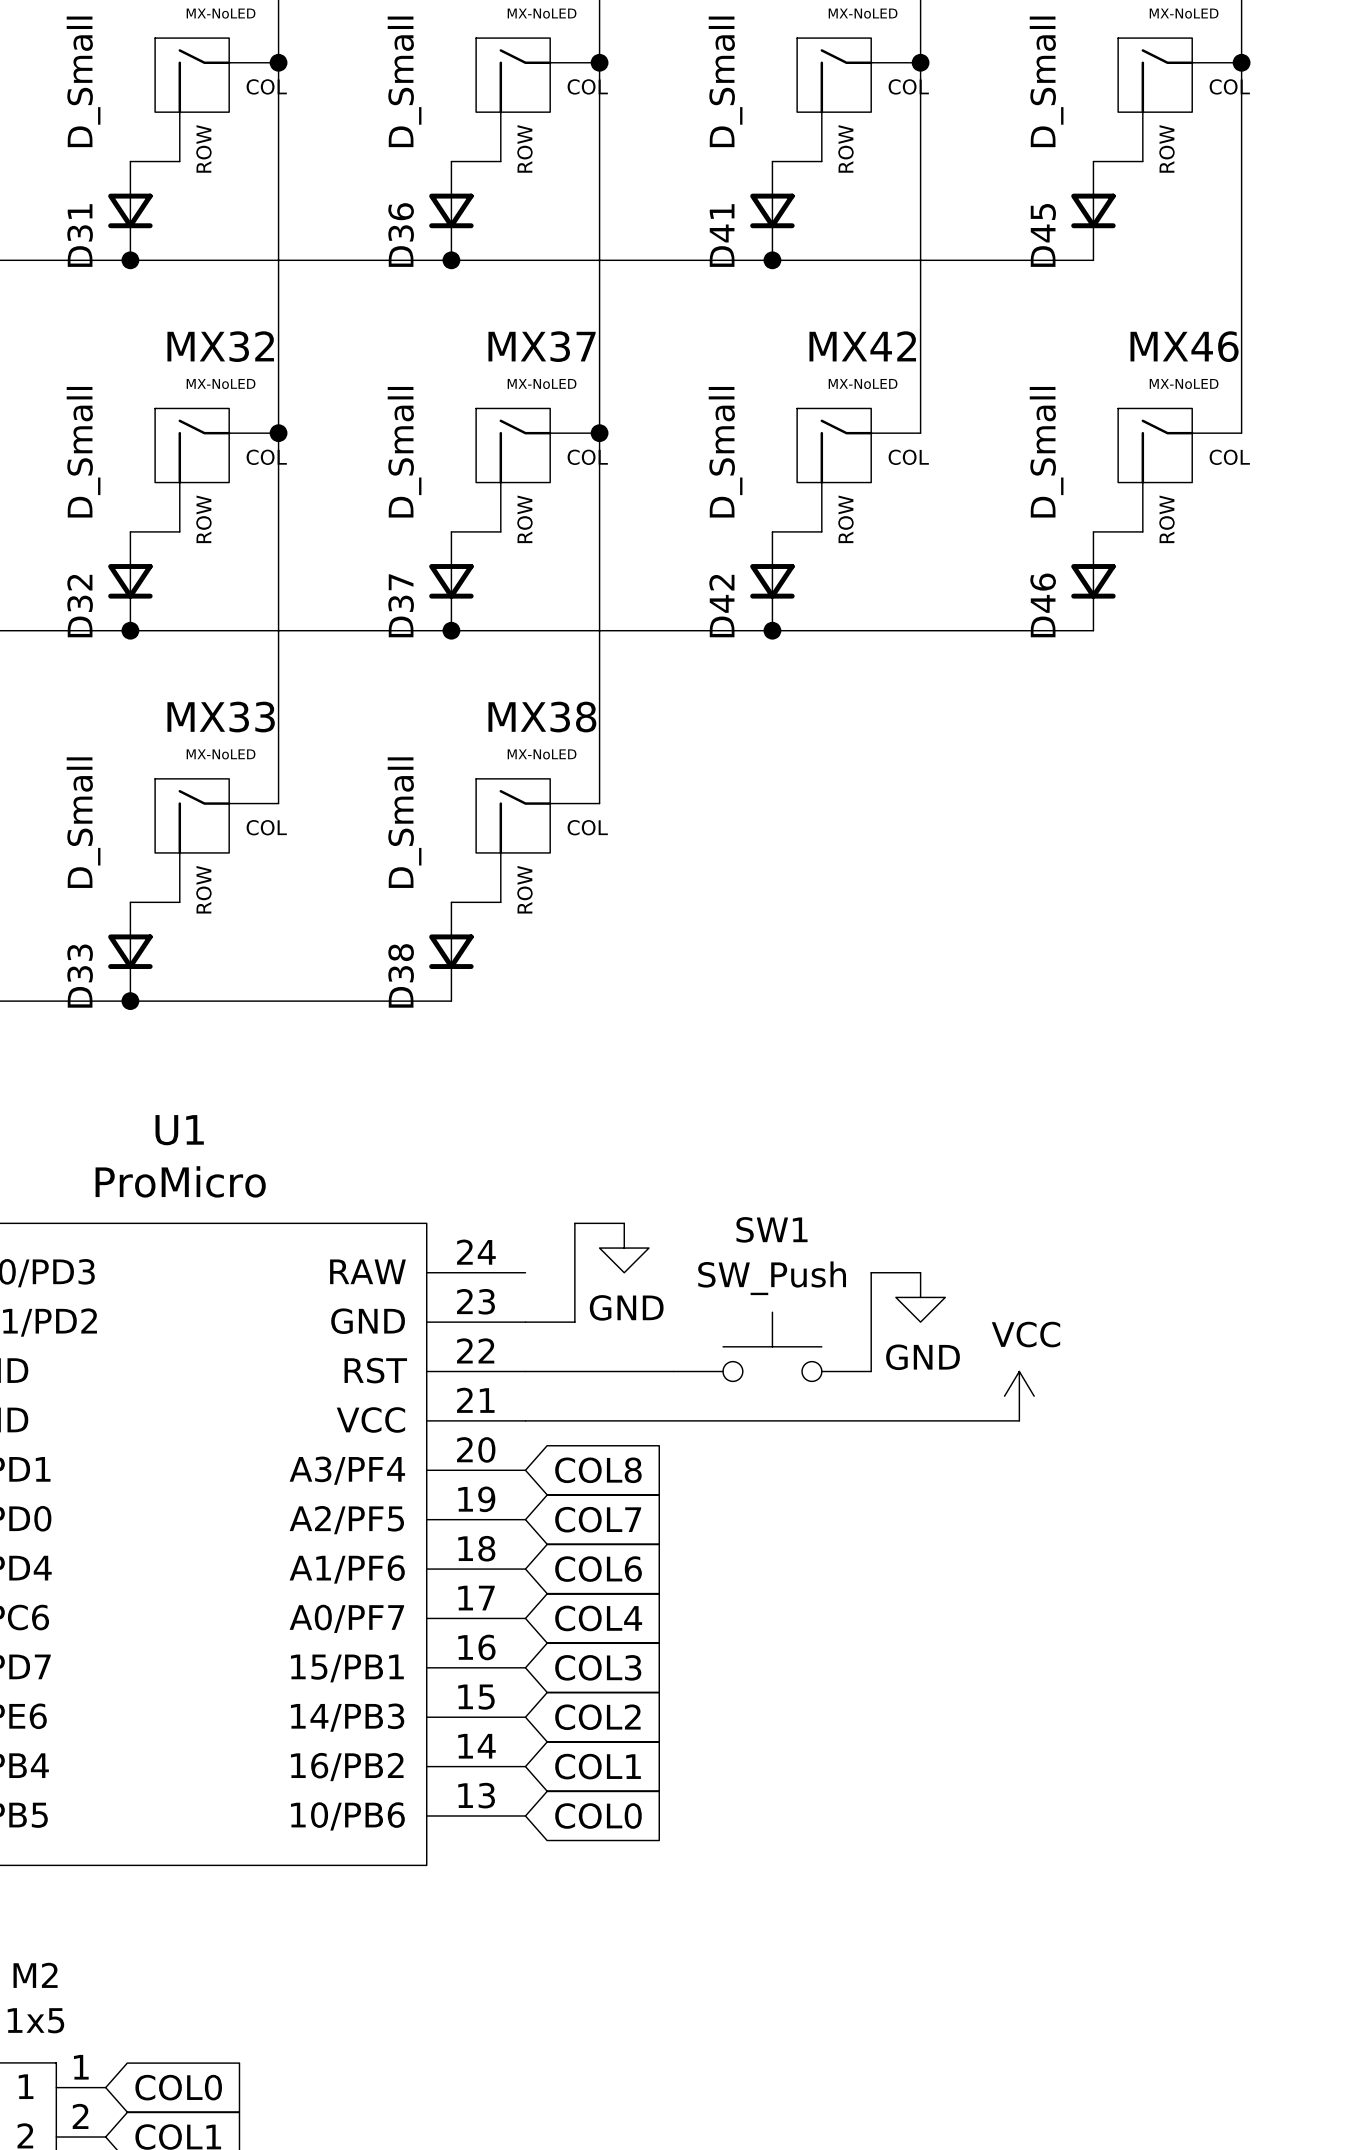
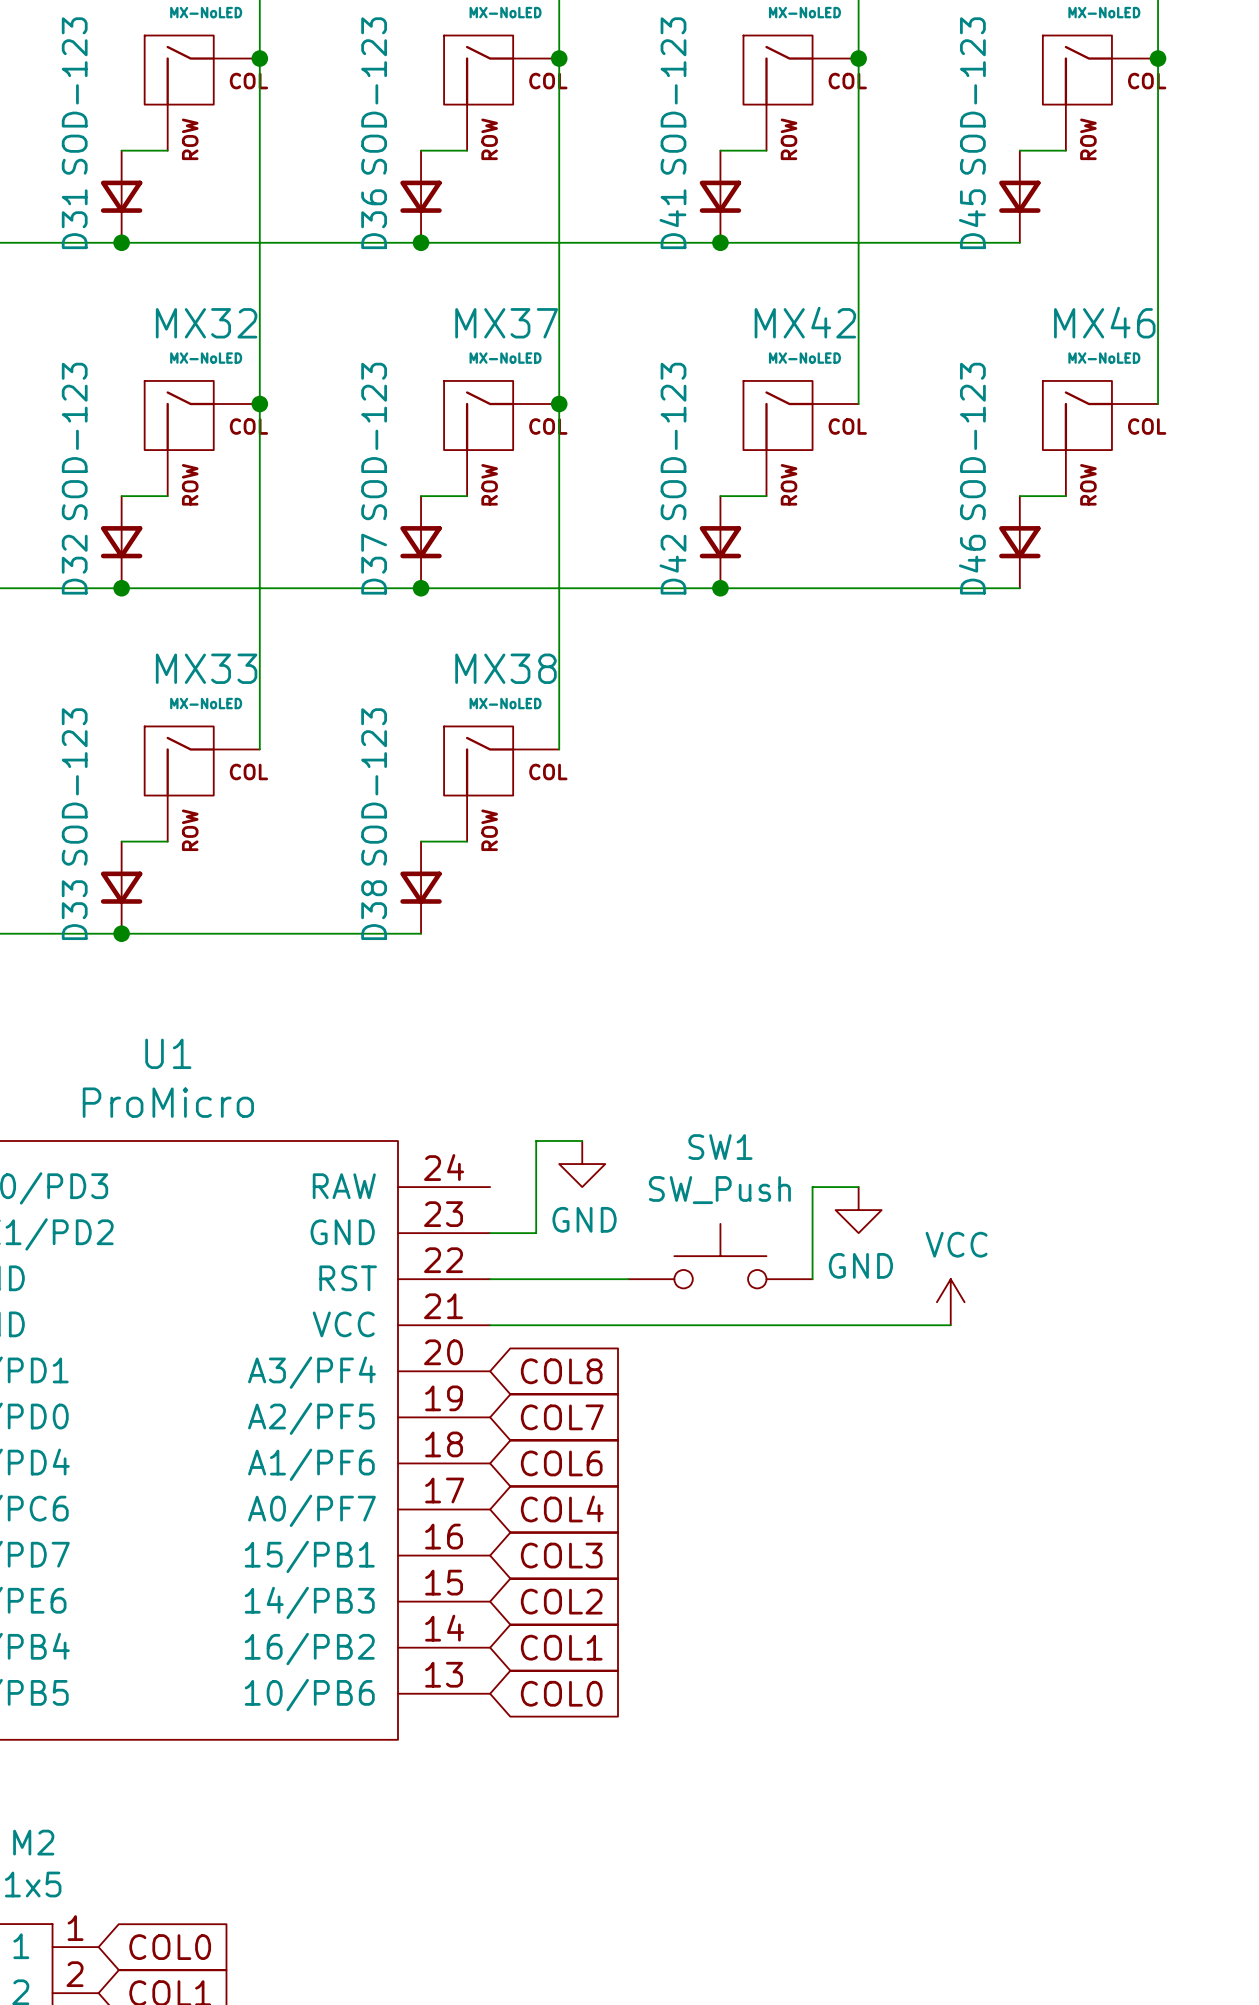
D31 value: D_Small (83, 81) -> SOD-123 (74, 96)
D36 value: D_Small (404, 81) -> SOD-123 (374, 96)
D41 value: D_Small (725, 81) -> SOD-123 (673, 96)
D45 value: D_Small (1046, 81) -> SOD-123 (972, 96)
D32 value: D_Small (83, 452) -> SOD-123 (74, 441)
D37 value: D_Small (404, 452) -> SOD-123 (374, 441)
D42 value: D_Small (725, 452) -> SOD-123 (673, 441)
D46 value: D_Small (1046, 452) -> SOD-123 (972, 441)
D33 value: D_Small (83, 822) -> SOD-123 (74, 786)
D38 value: D_Small (404, 822) -> SOD-123 (374, 786)

